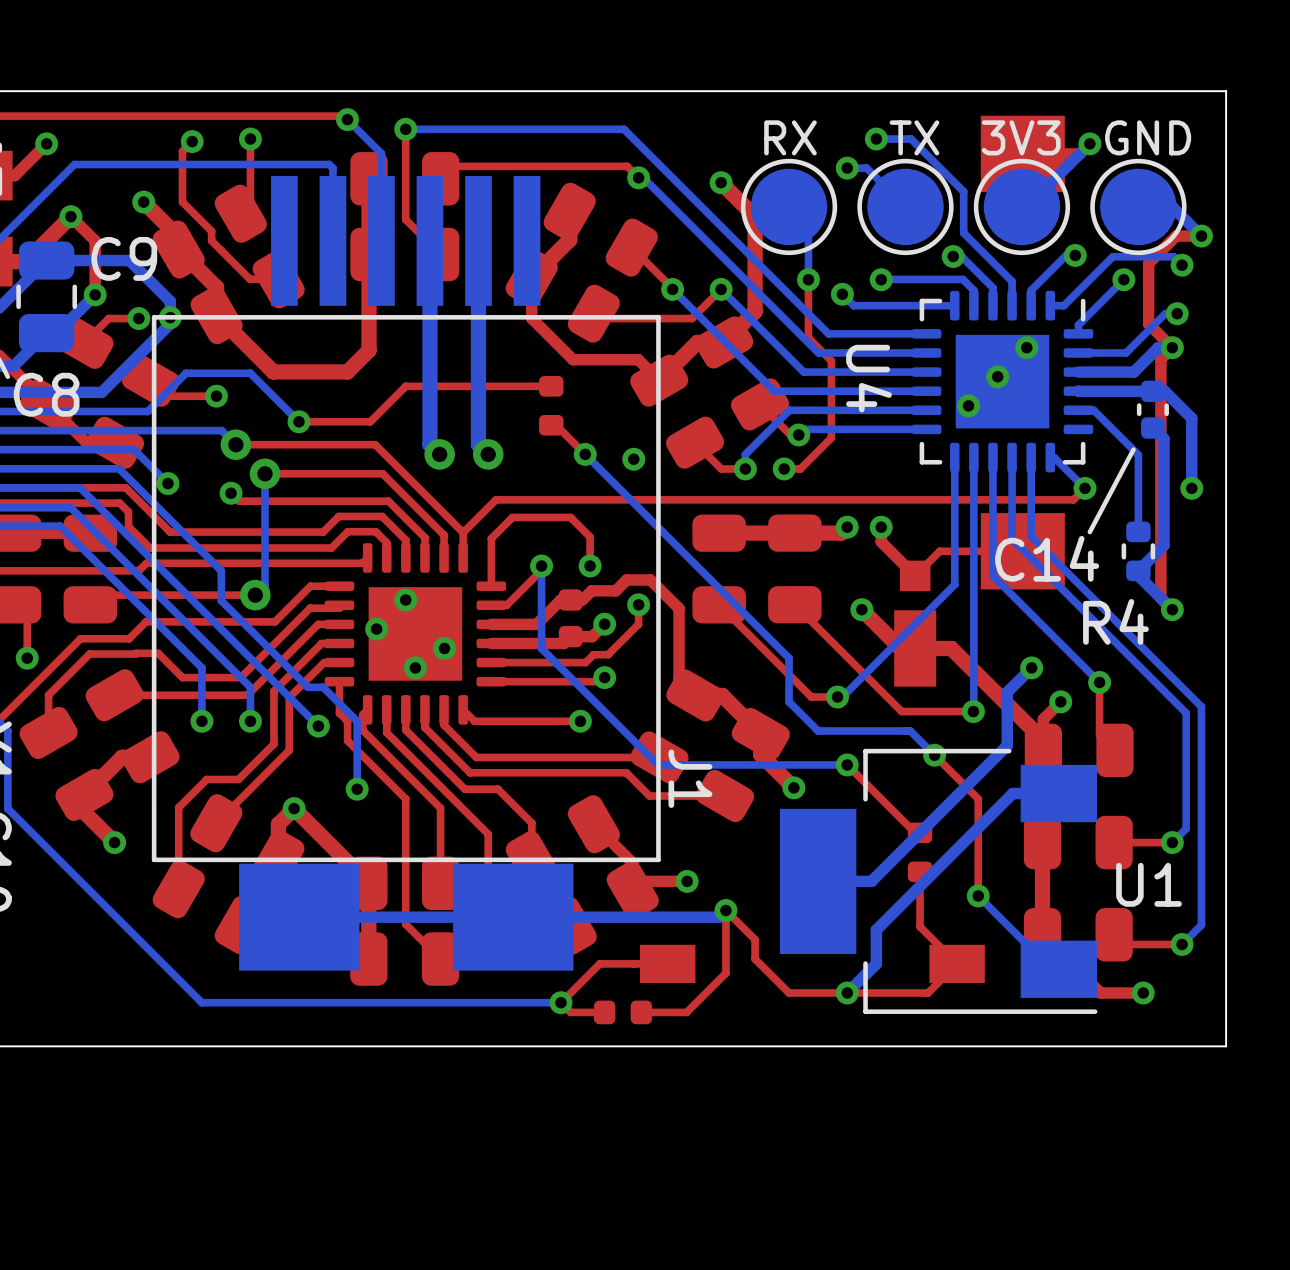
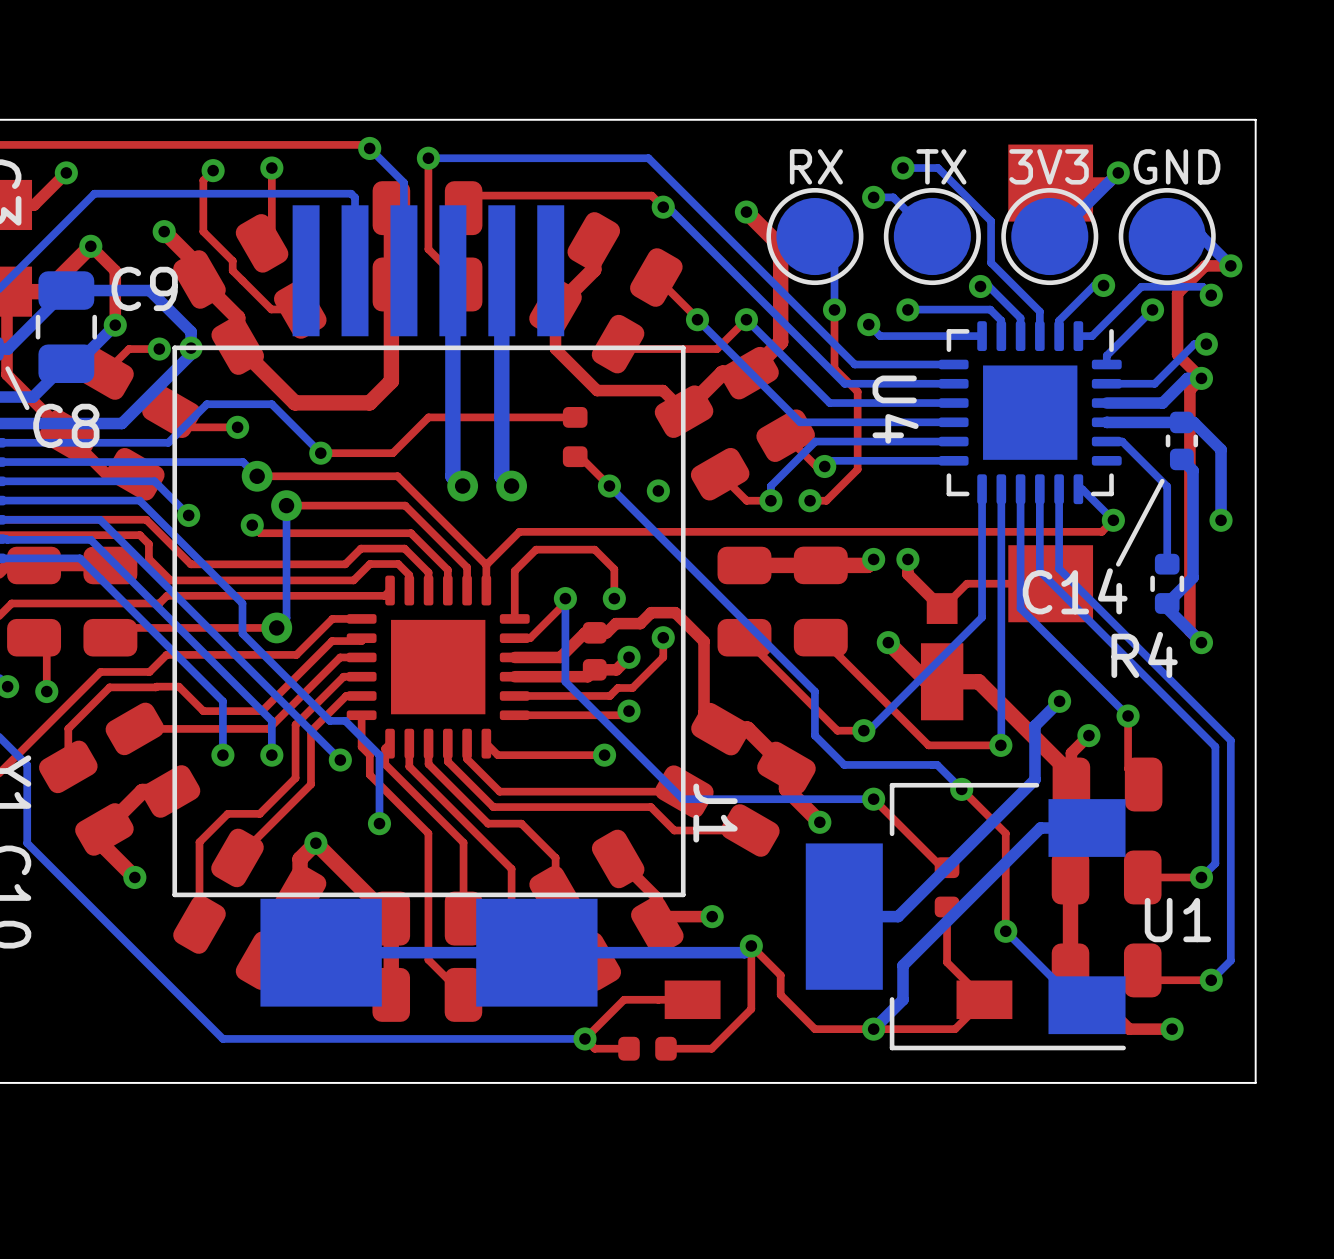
via: (1026, 347) -> none
via: (997, 376) -> none
via: (968, 405) -> none
via: (405, 599) -> none
via: (376, 629) -> none
via: (444, 648) -> none
via: (415, 667) -> none

